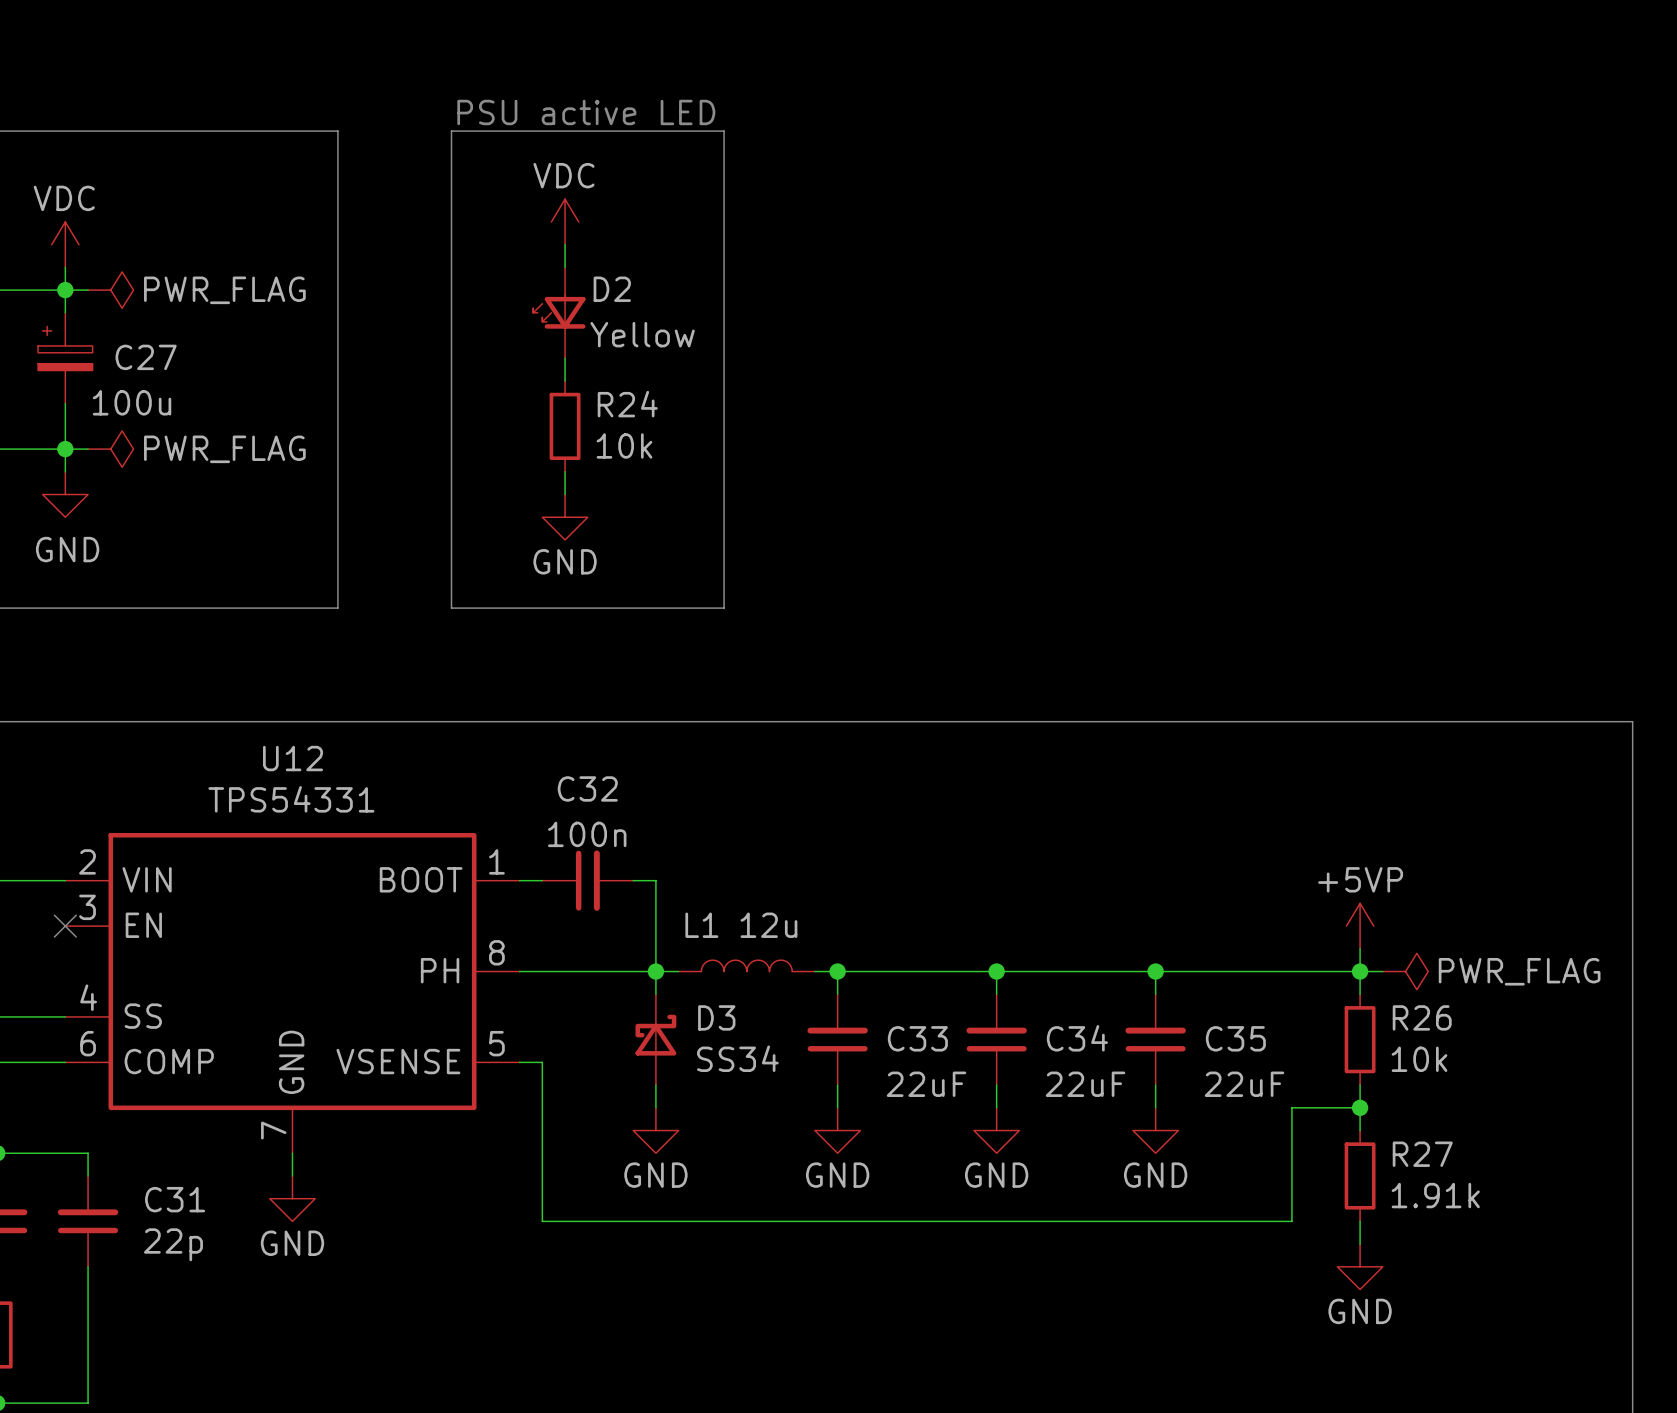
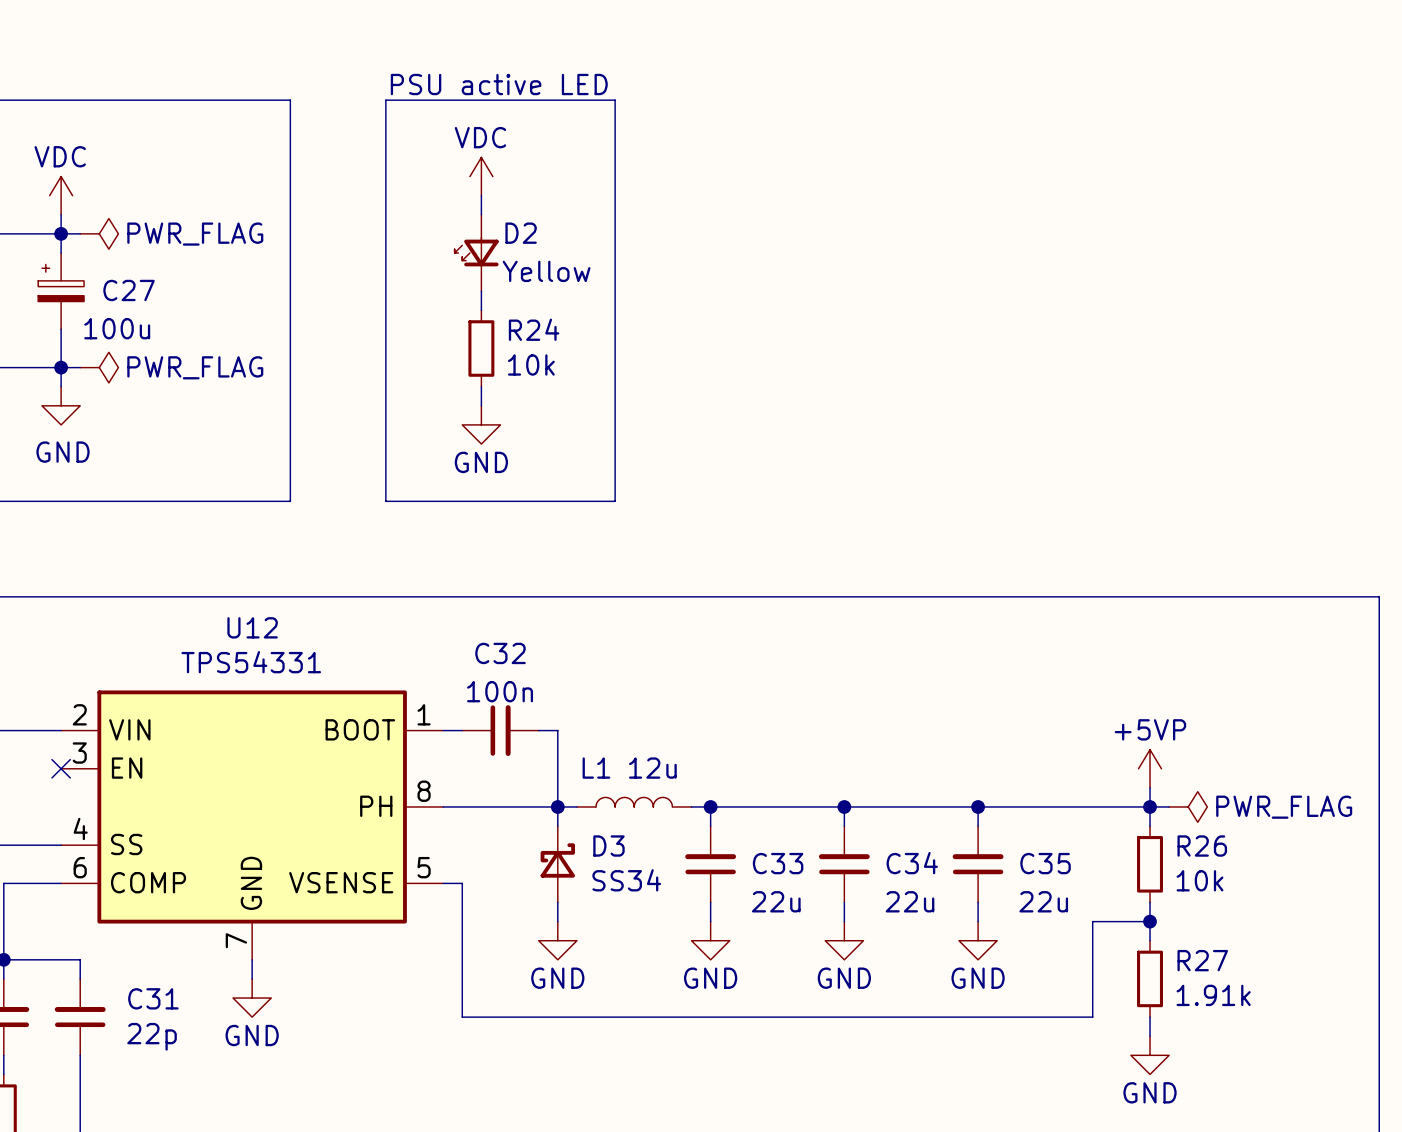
C33 value: 22uF (926, 1084) -> 22u (776, 901)
C34 value: 22uF (1085, 1084) -> 22u (910, 901)
C35 value: 22uF (1244, 1084) -> 22u (1043, 901)

